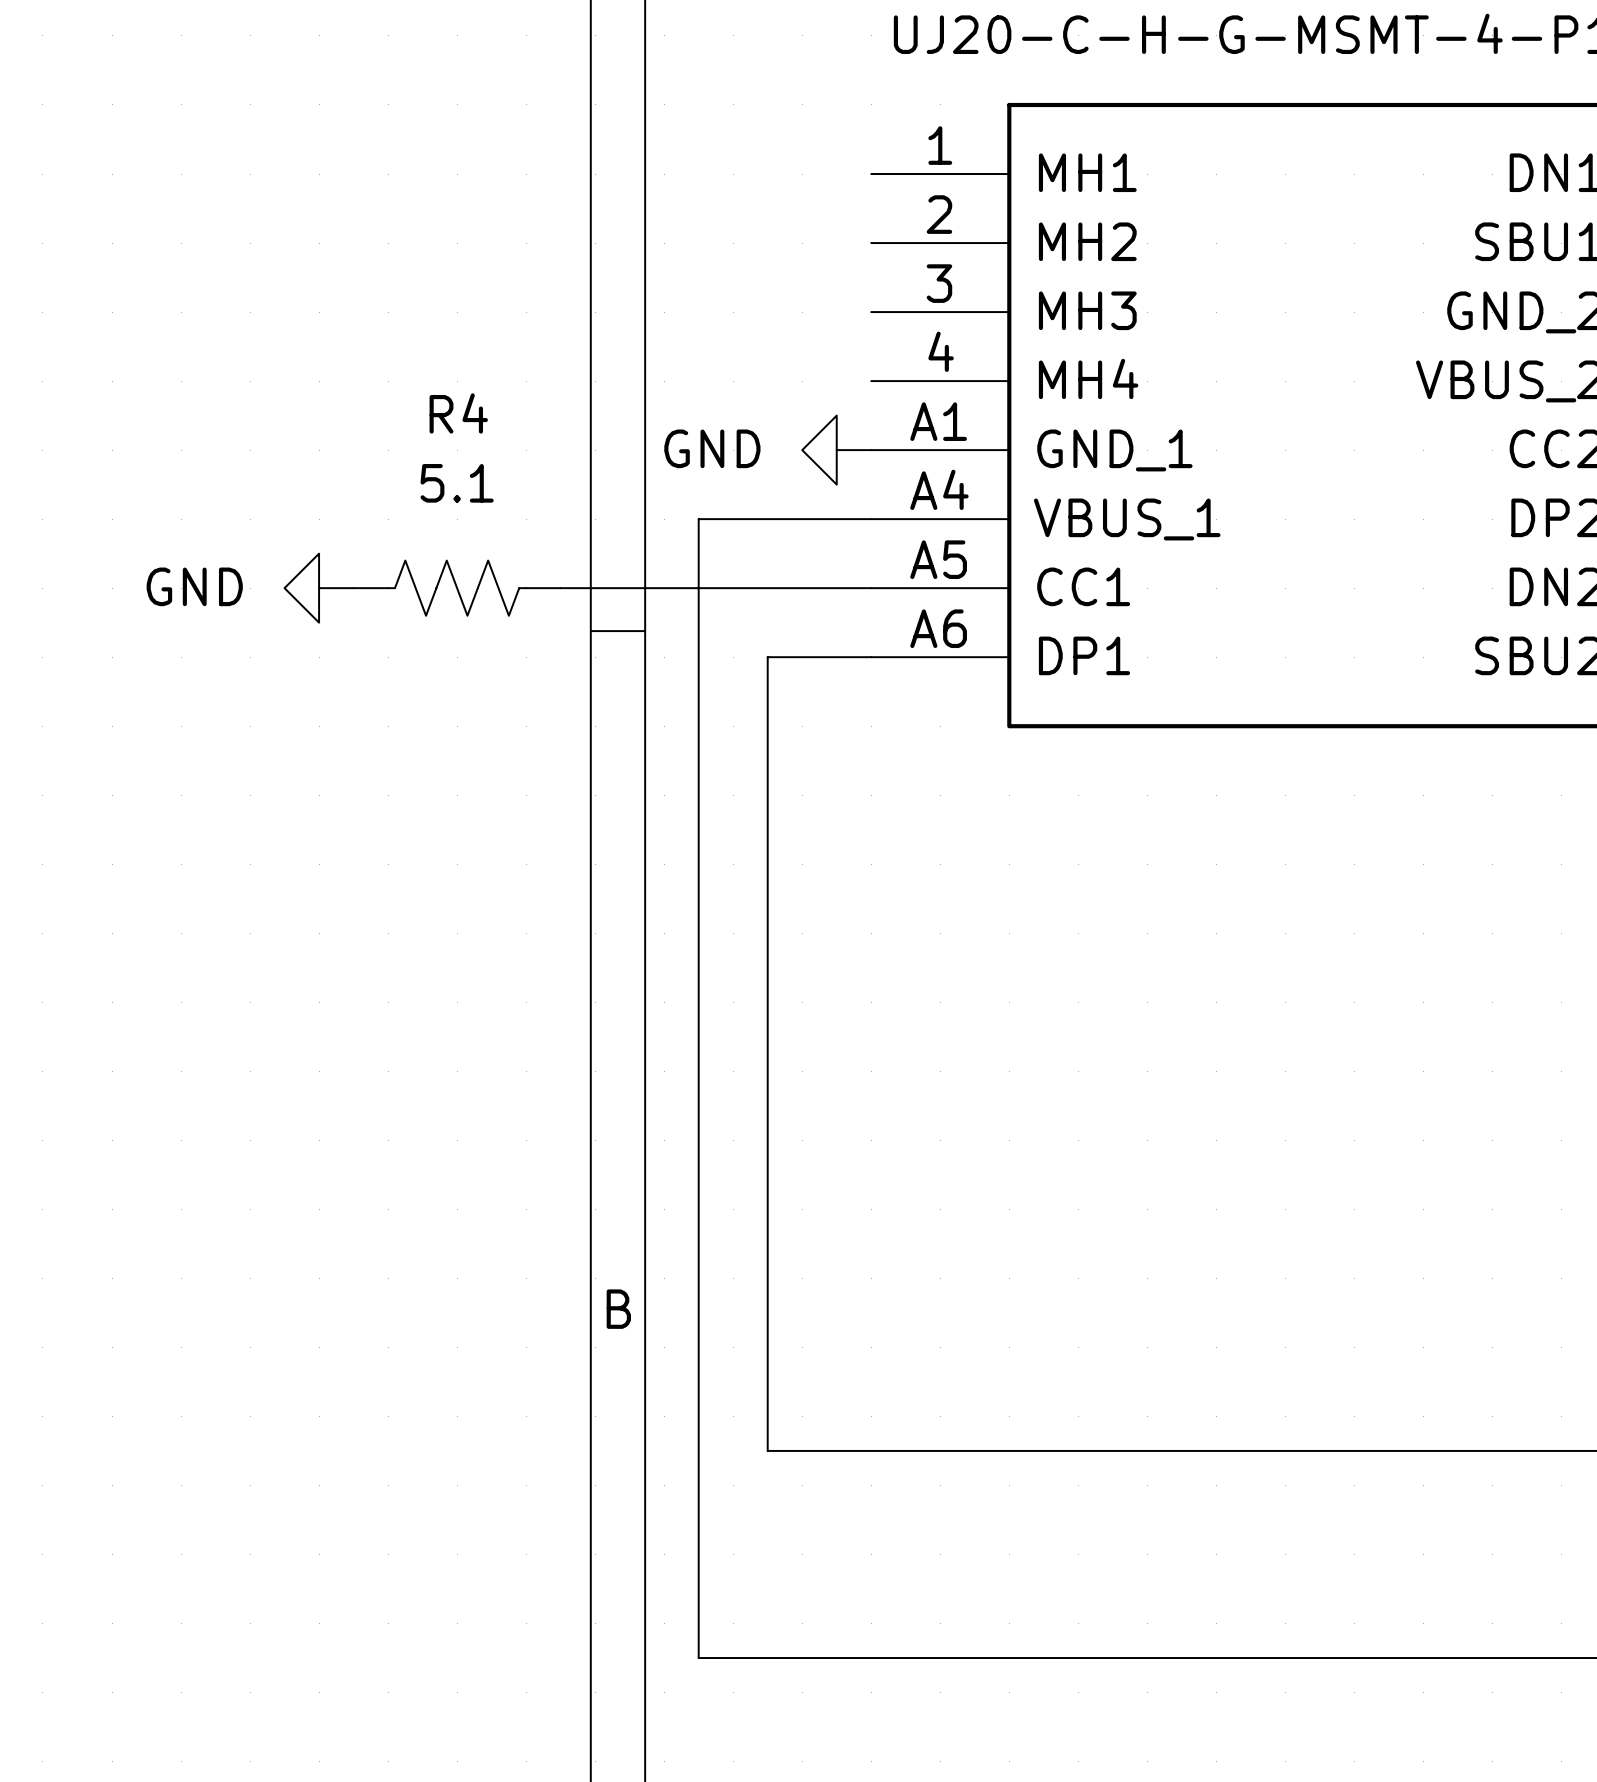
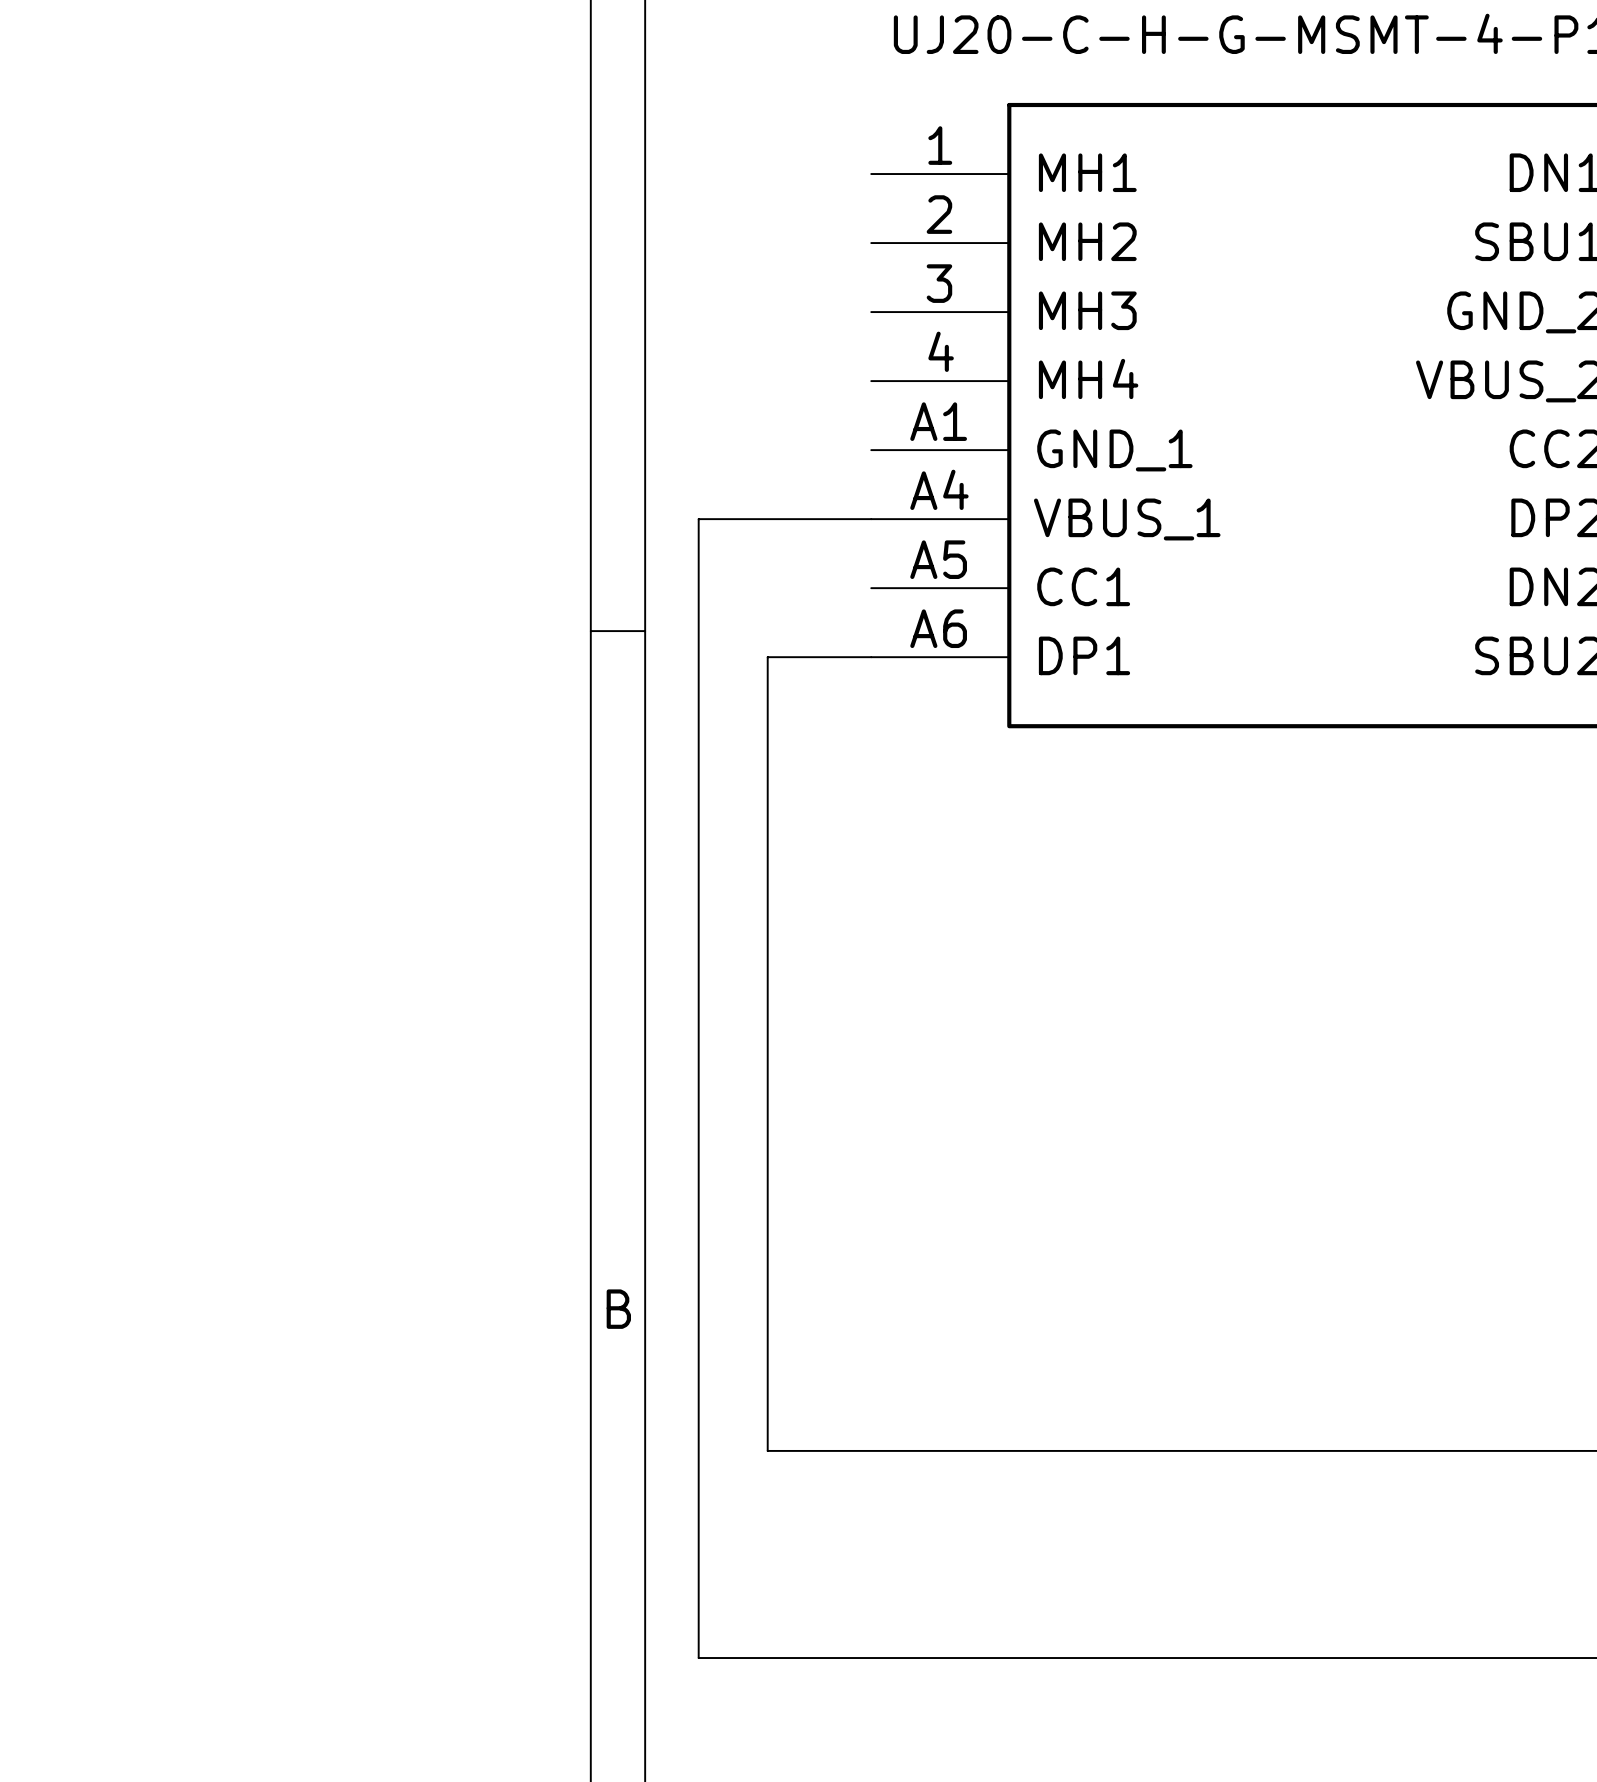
power symbol: GND (836, 450) -> none
power symbol: GND (319, 588) -> none
R4: 5.1 (457, 588) -> none
wire: (560, 588) (871, 588) -> none

